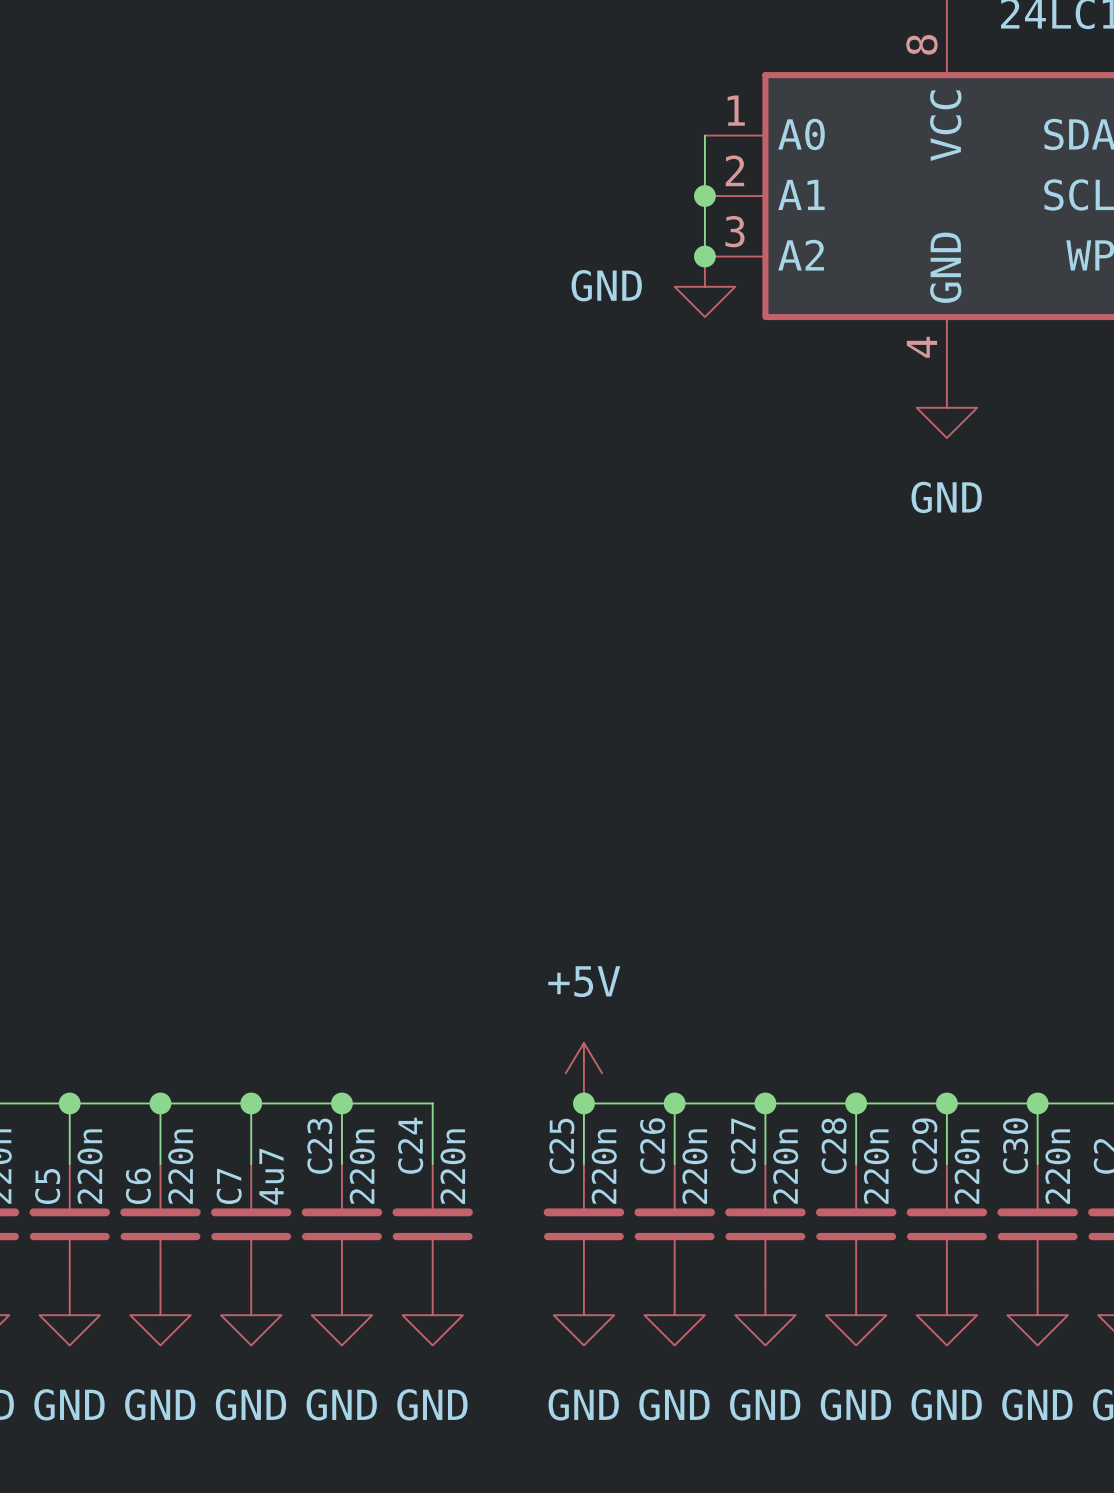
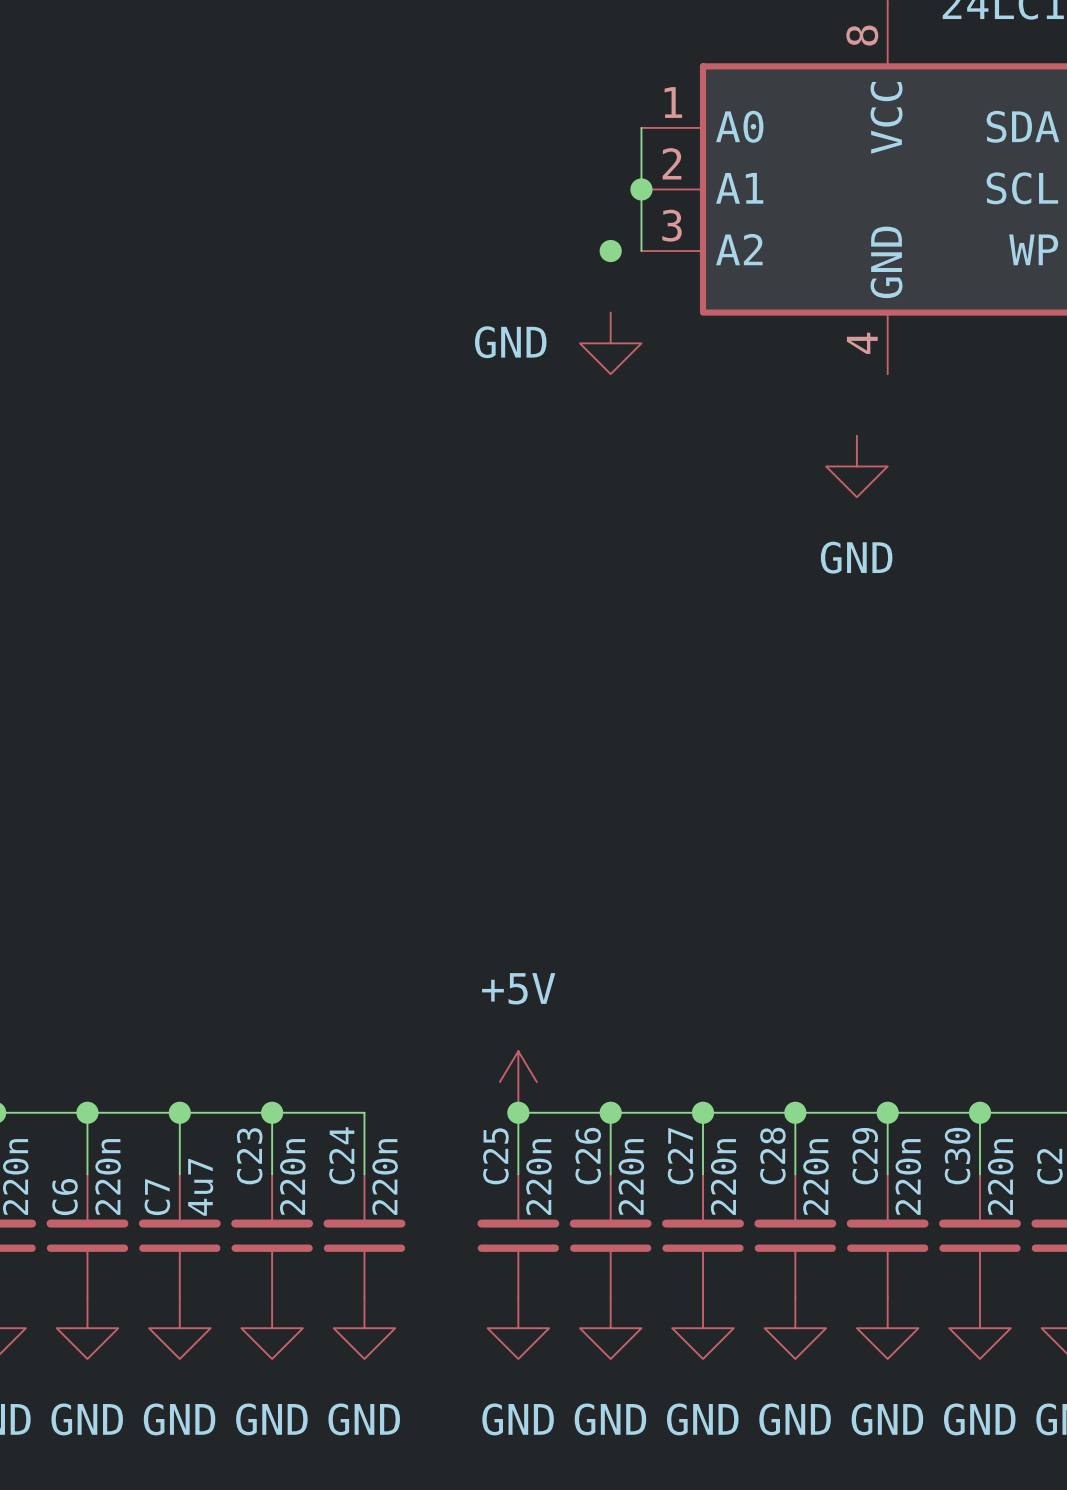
junction position: (704, 256) -> (610, 251)
power symbol position: GND (704, 286) -> GND (610, 343)
power symbol position: GND (946, 407) -> GND (856, 466)

